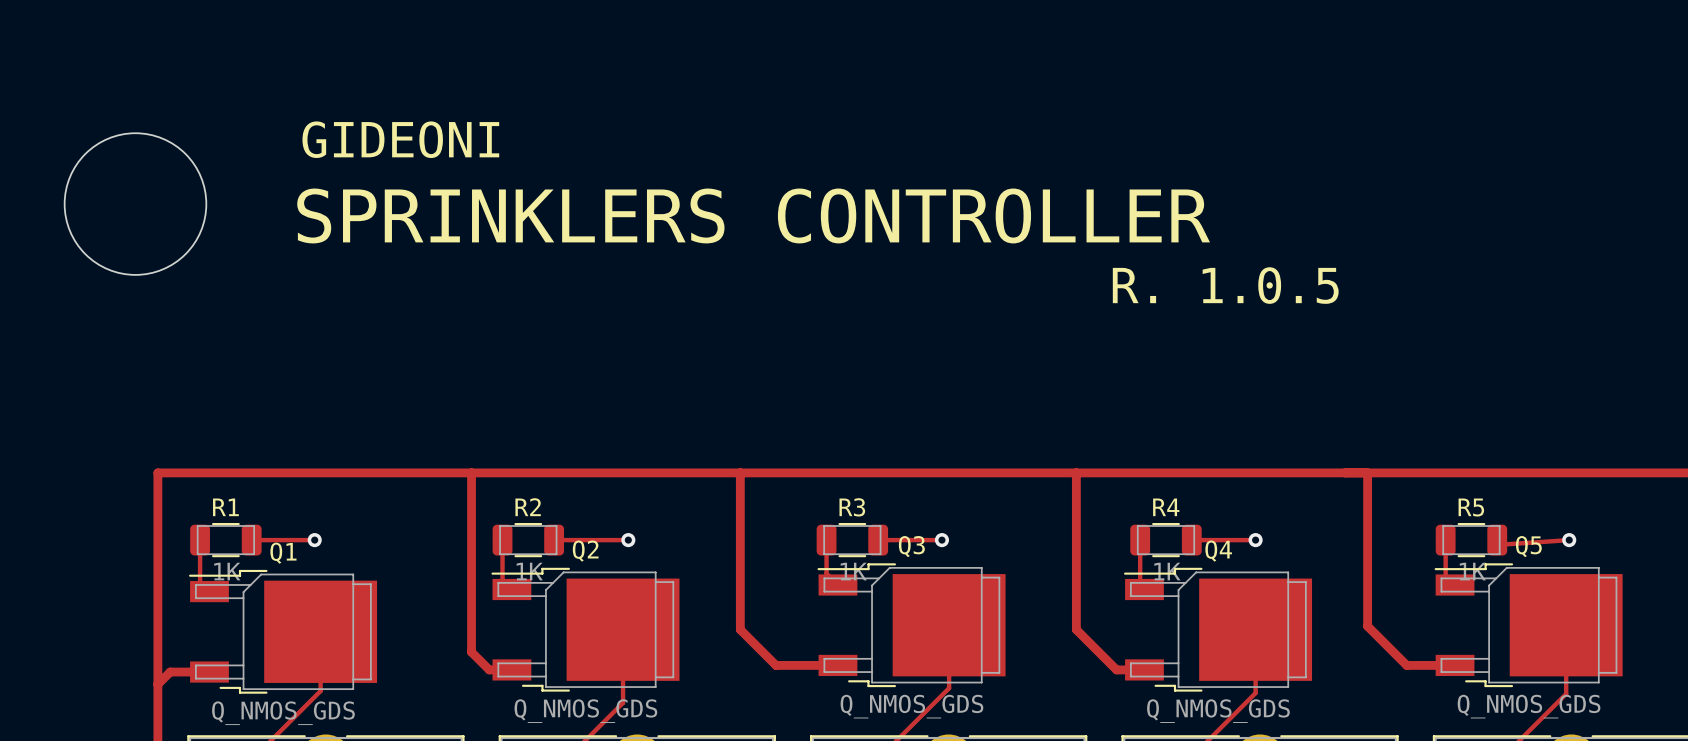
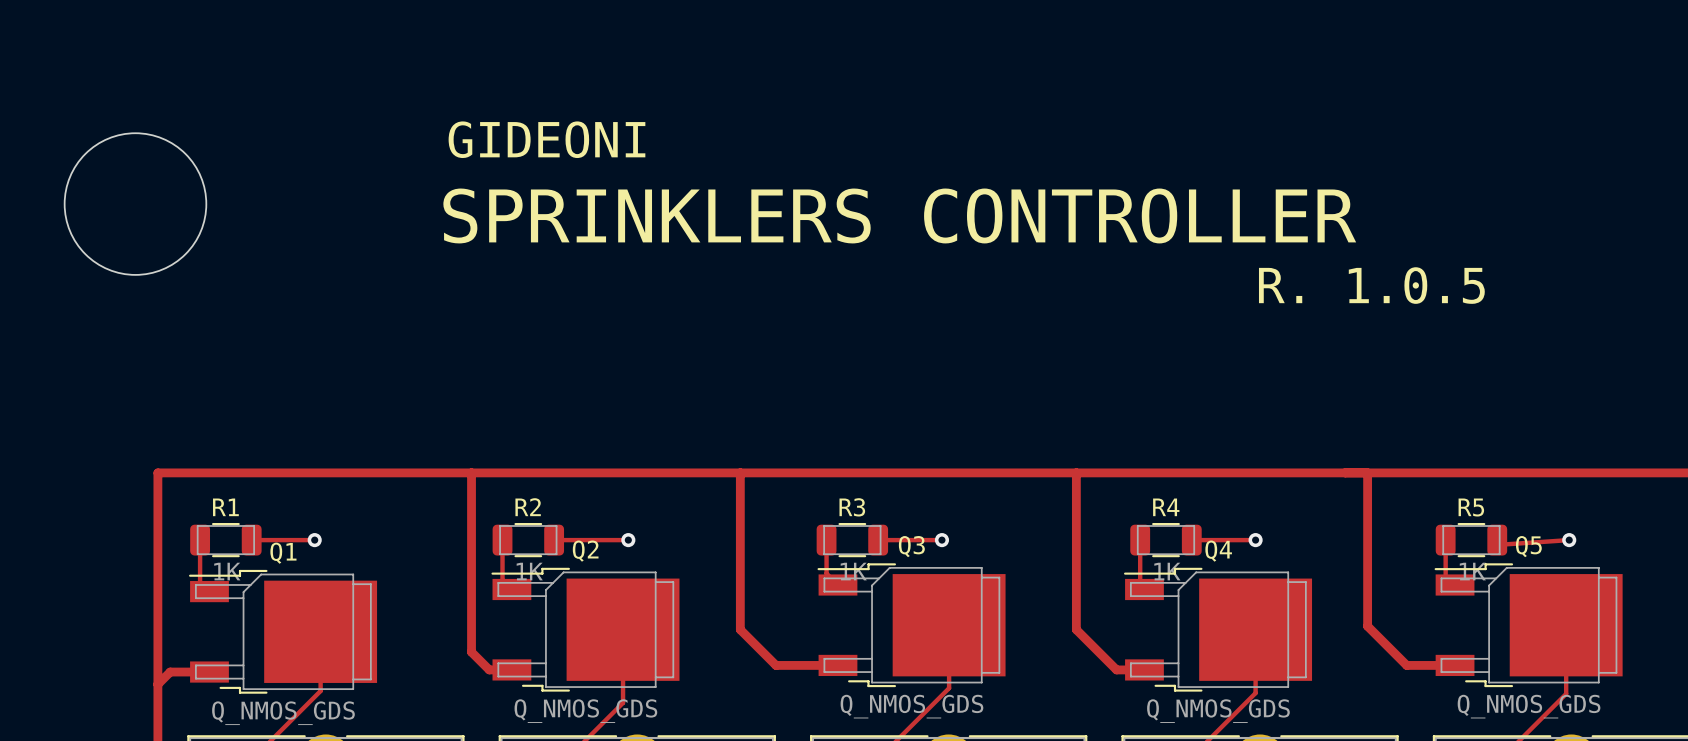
text position: GIDEONI (400, 139) -> GIDEONI (546, 139)
text position: SPRINKLERS CONTROLLER (753, 215) -> SPRINKLERS CONTROLLER (899, 215)
text position: R. 1.0.5 (1225, 285) -> R. 1.0.5 (1371, 285)

